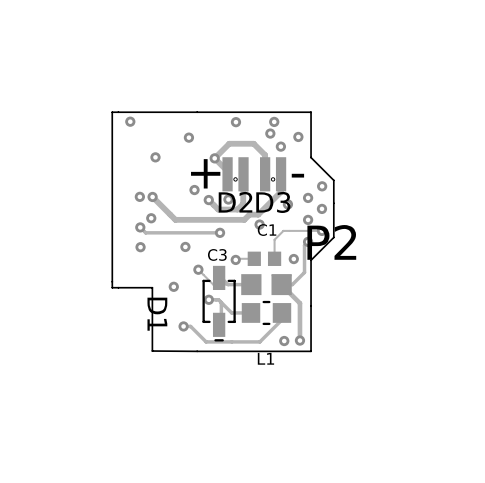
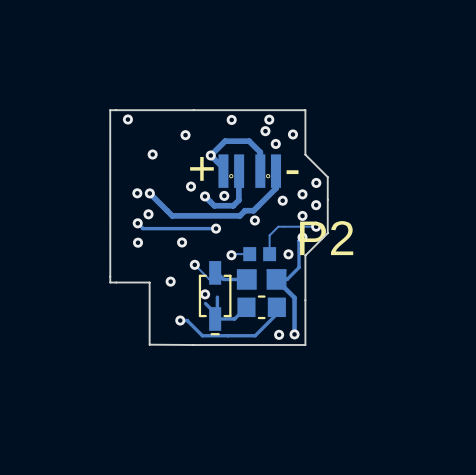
D2 name: D2 (235, 202) -> none
D3 name: D3 (273, 202) -> none
C1 name: C1 (267, 230) -> none
C3 name: C3 (217, 254) -> none
track: (208, 299) (218, 299) (231, 312) (250, 312) -> (205, 303) (215, 313) (215, 318) (234, 318) (246, 307)
D1 name: D1 (157, 314) -> none
L1 name: L1 (265, 358) -> none

